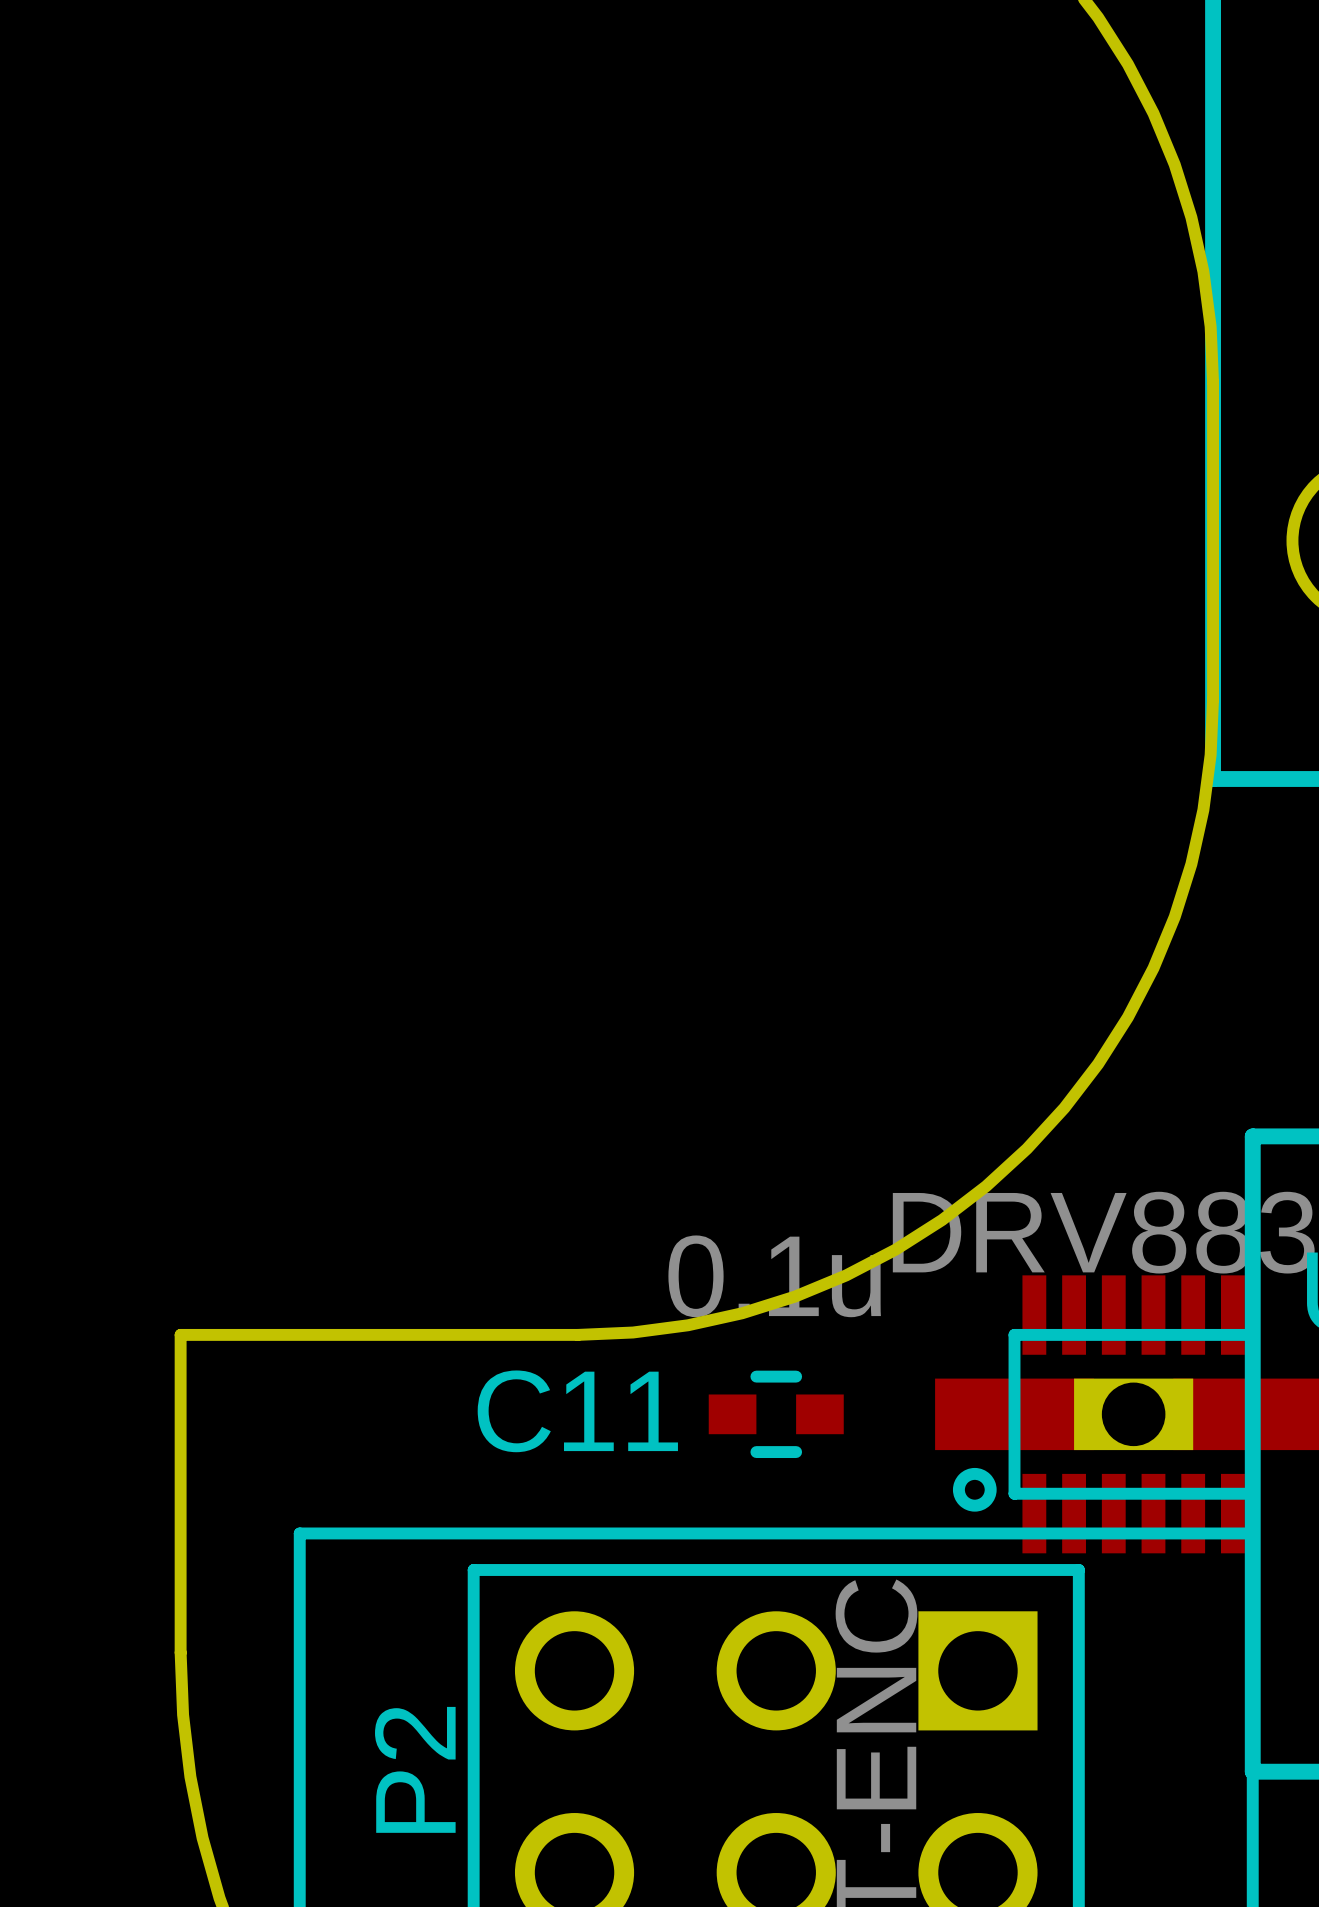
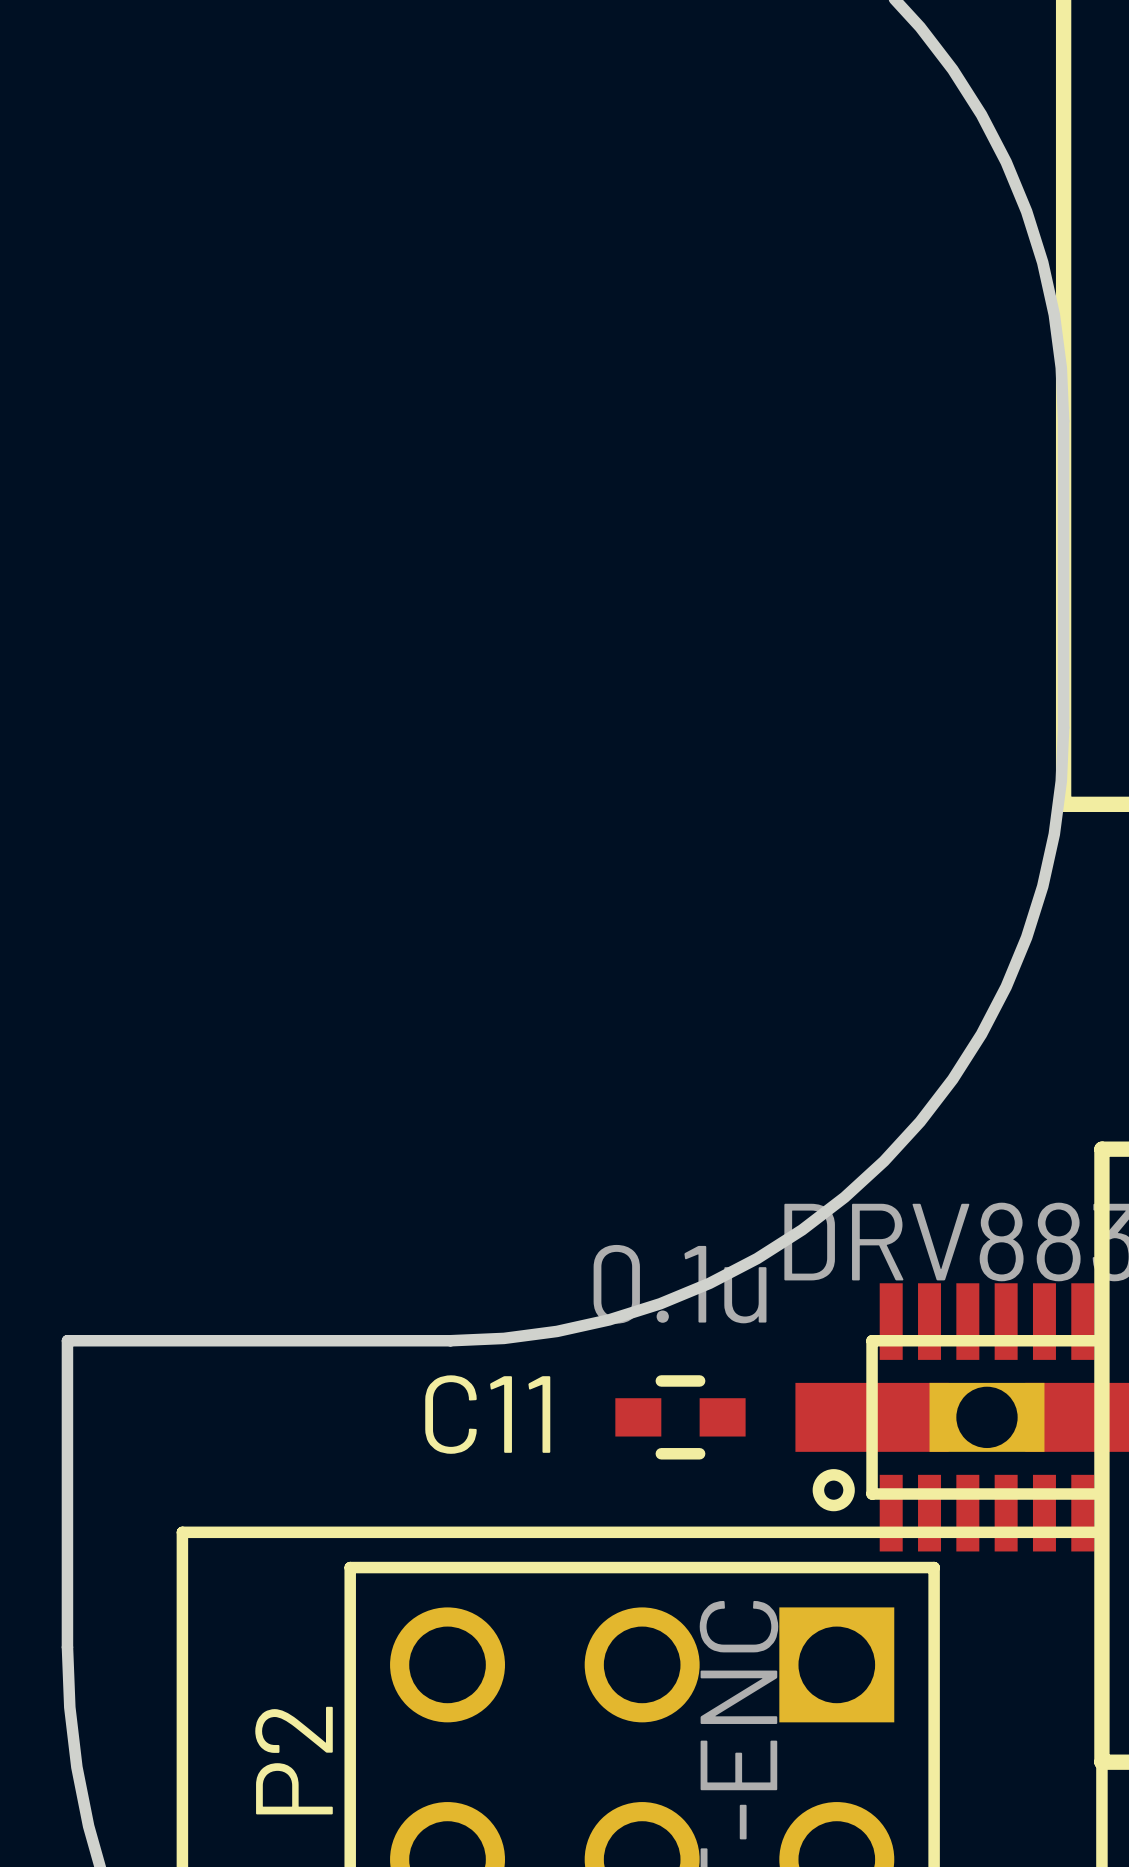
C11 position: (776, 1414) -> (680, 1417)

